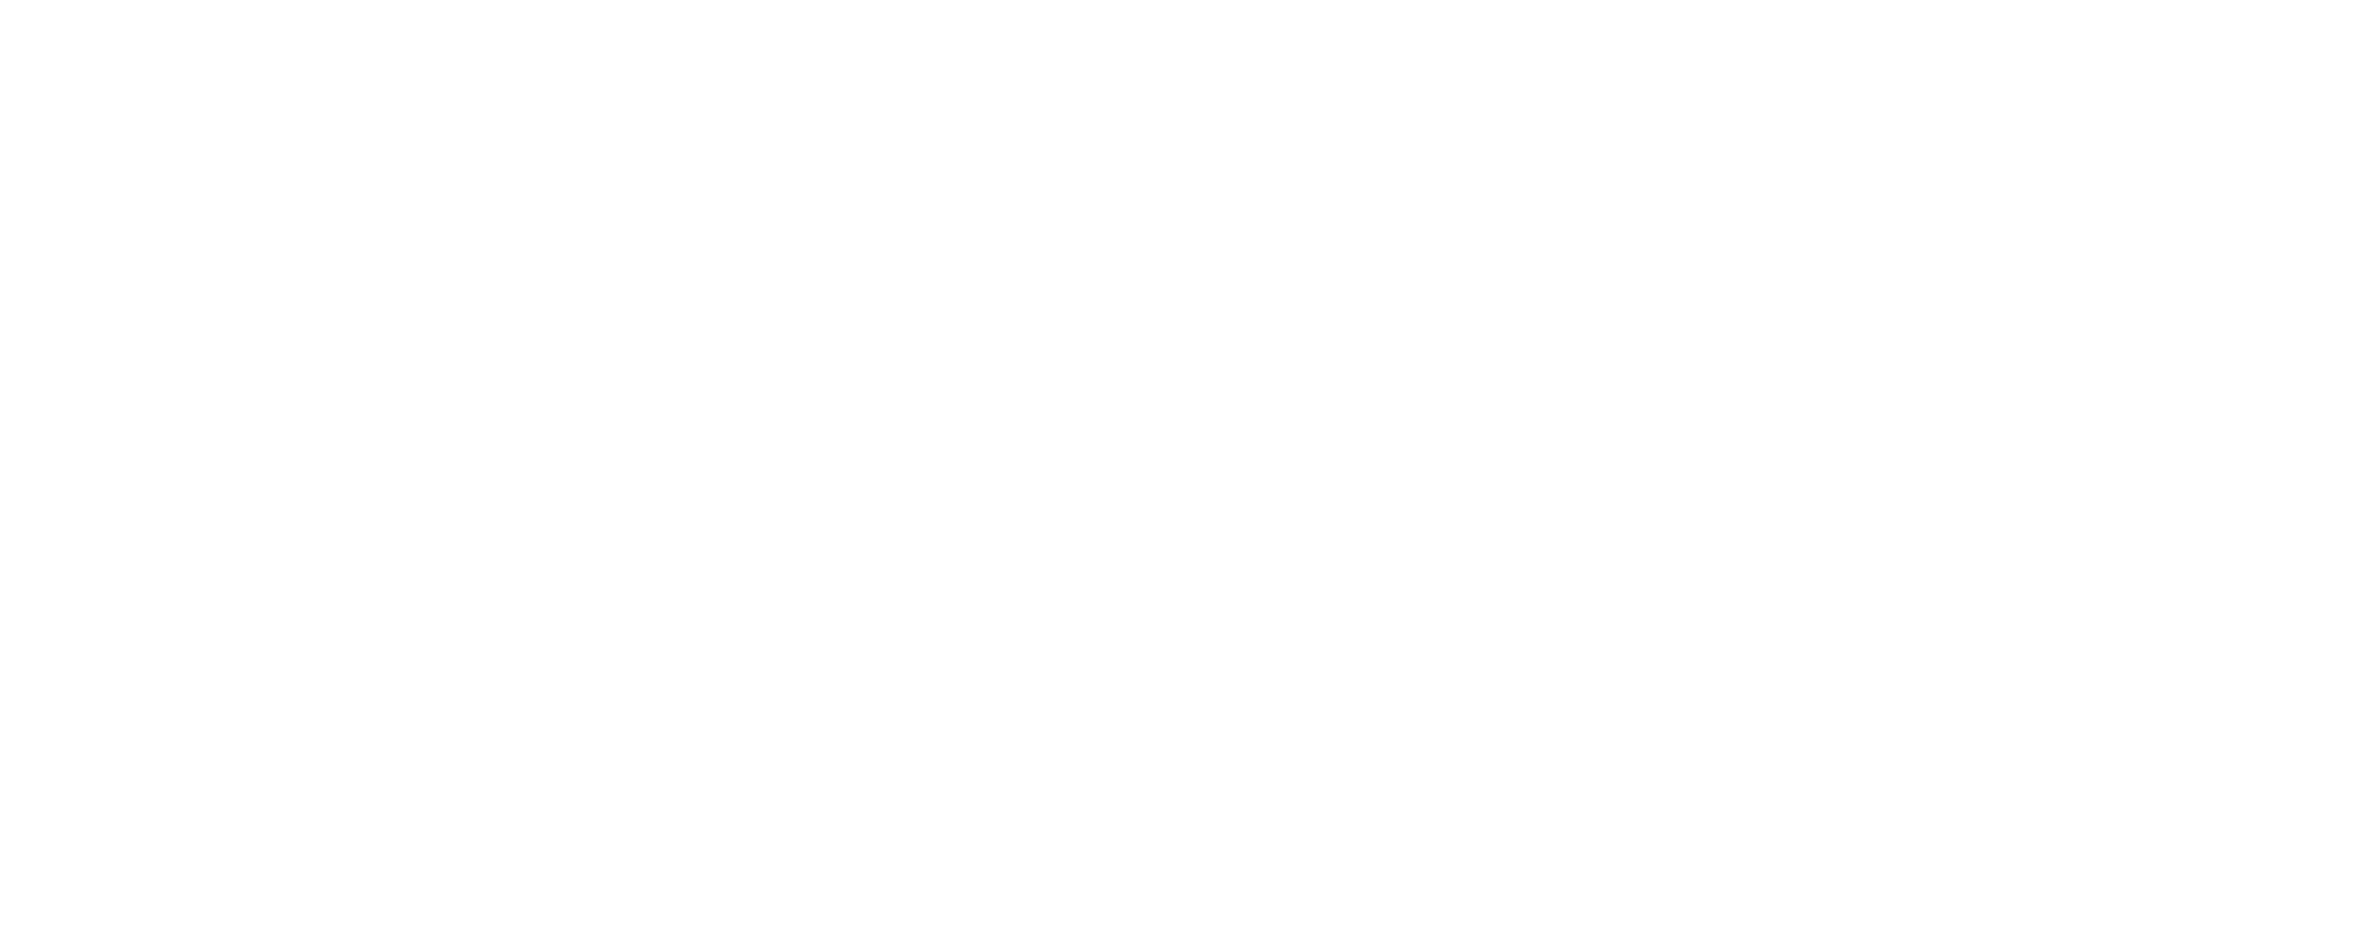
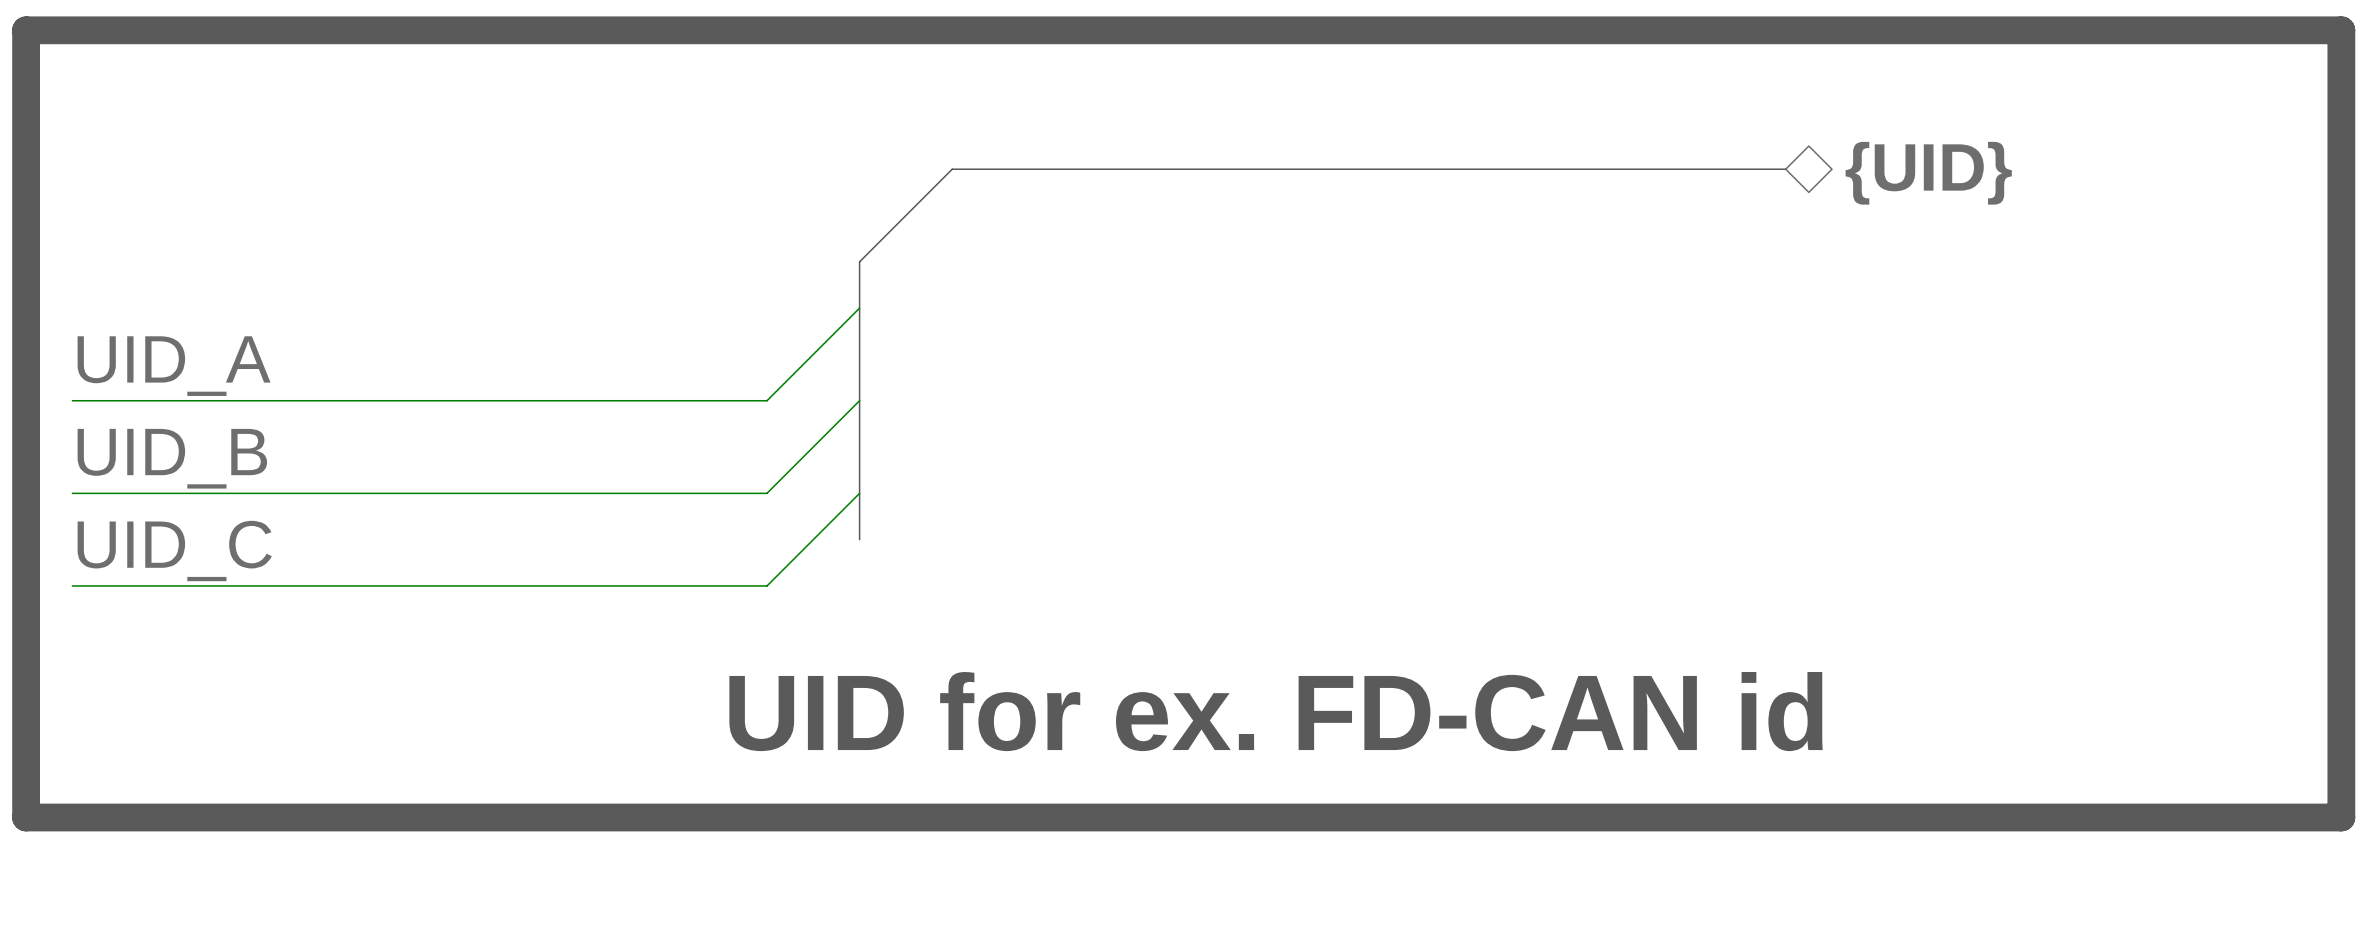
line: none -> (26, 30) (2341, 30) (2341, 817) (26, 817) (26, 30)
bus: none -> (1785, 169) (952, 169) (859, 261) (859, 539)
hierarchical label: none -> {UID} (1928, 173)
wire: none -> (859, 308) (766, 400) (72, 400)
label: none -> UID_A (174, 366)
wire: none -> (859, 400) (766, 493) (72, 493)
label: none -> UID_B (172, 458)
wire: none -> (859, 493) (766, 585) (72, 585)
label: none -> UID_C (174, 550)
text: none -> UID for ex. FD-CAN id (1276, 711)

